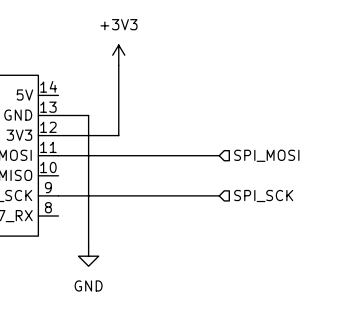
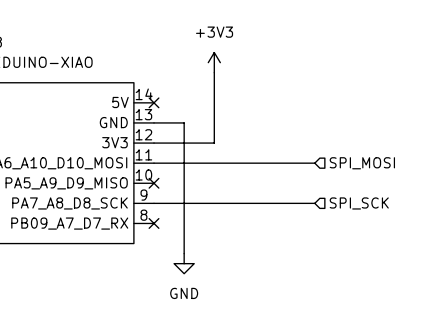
no-connect mark: none -> (154, 102)
no-connect mark: none -> (154, 183)
no-connect mark: none -> (154, 223)

